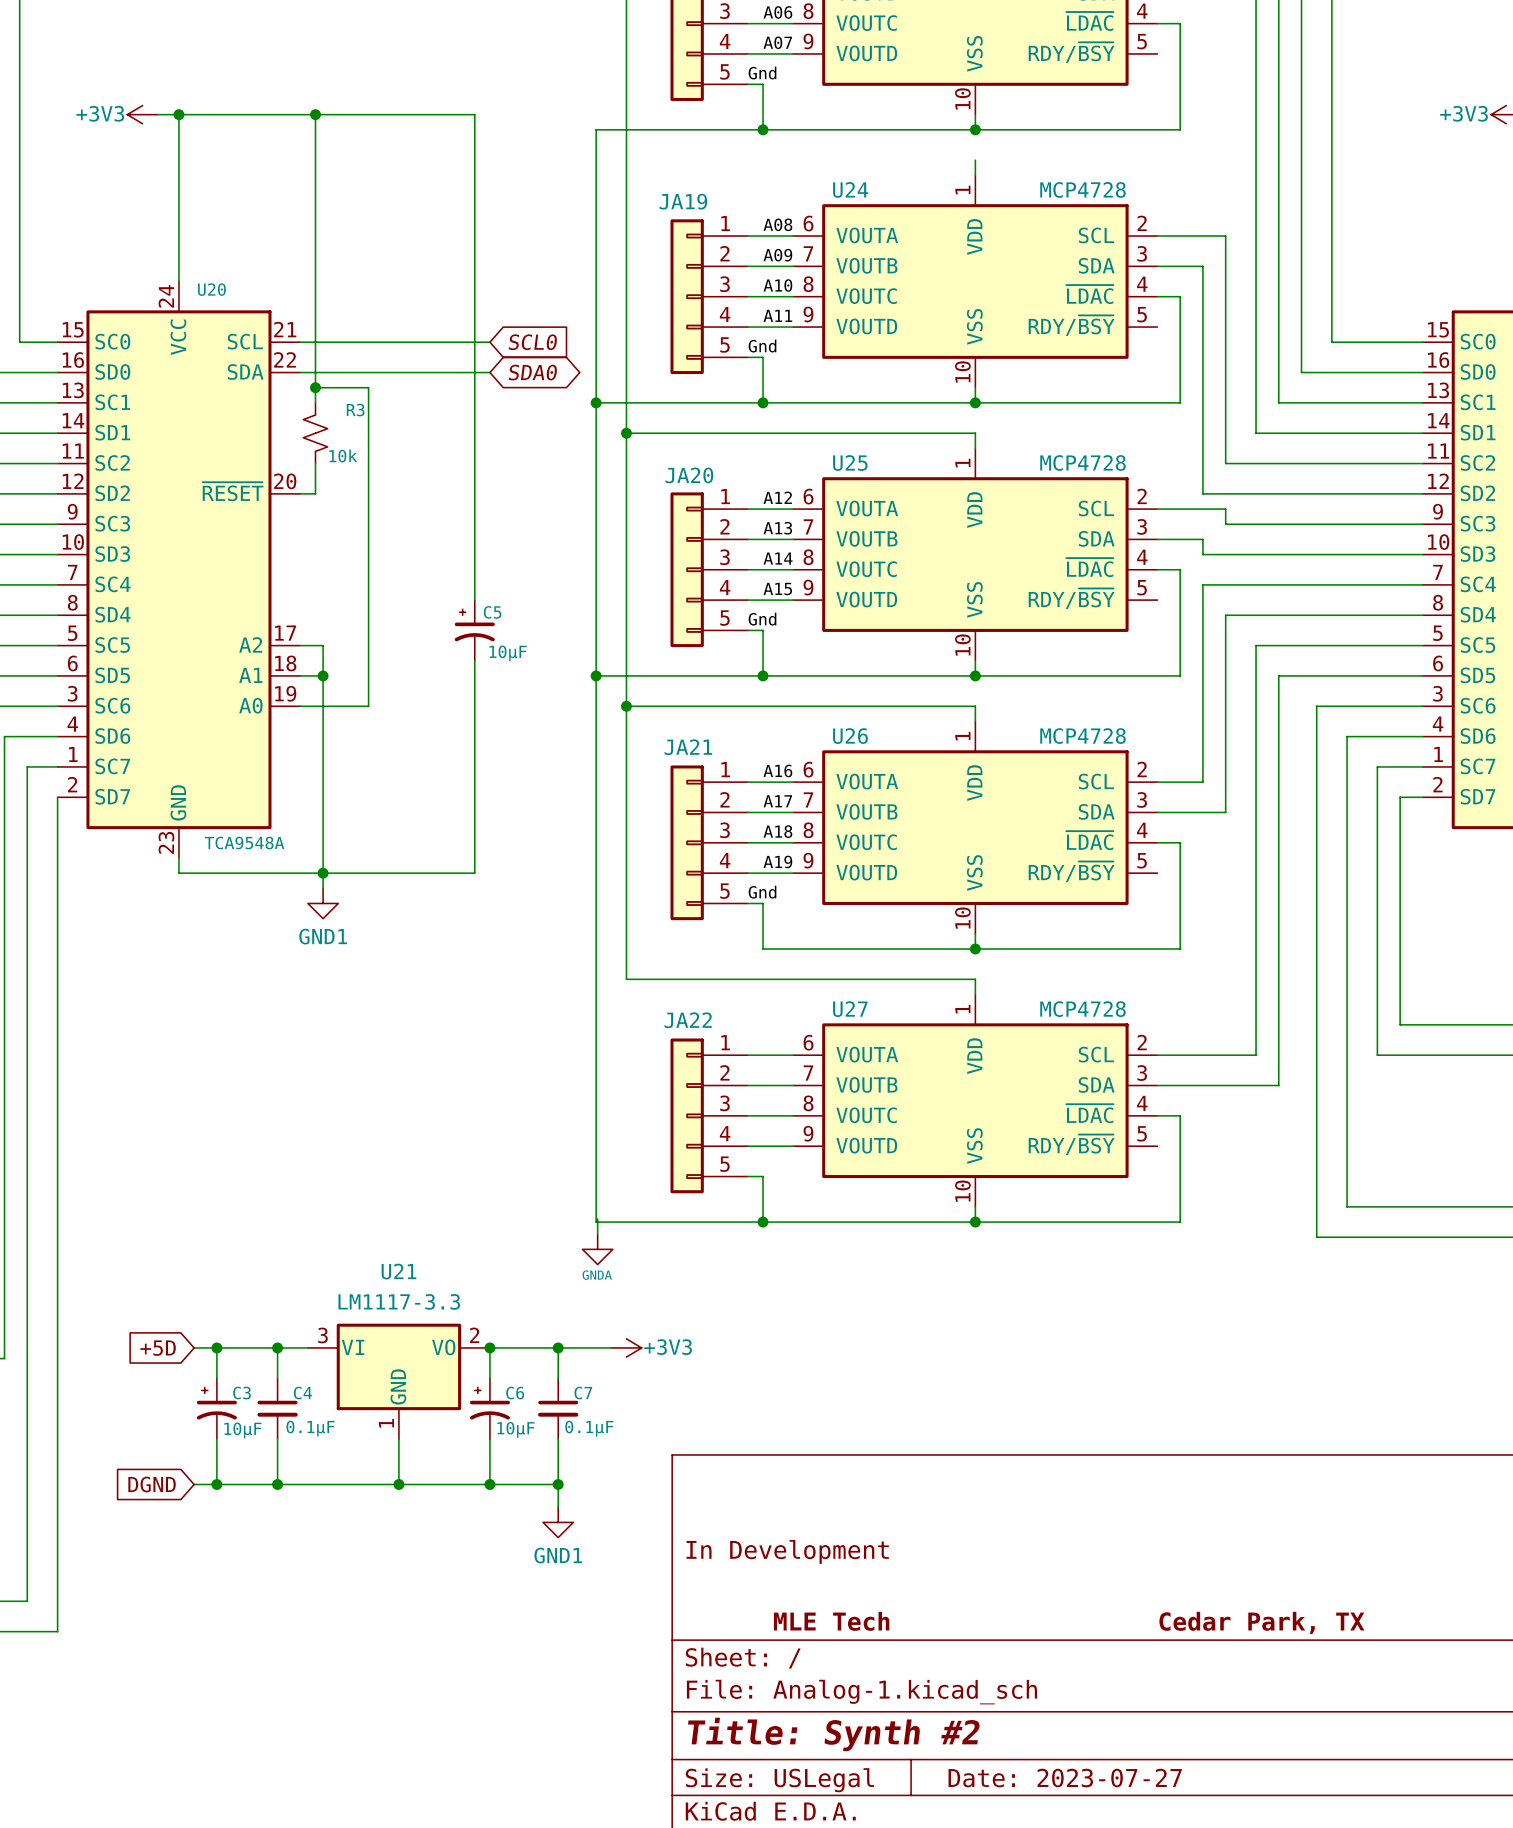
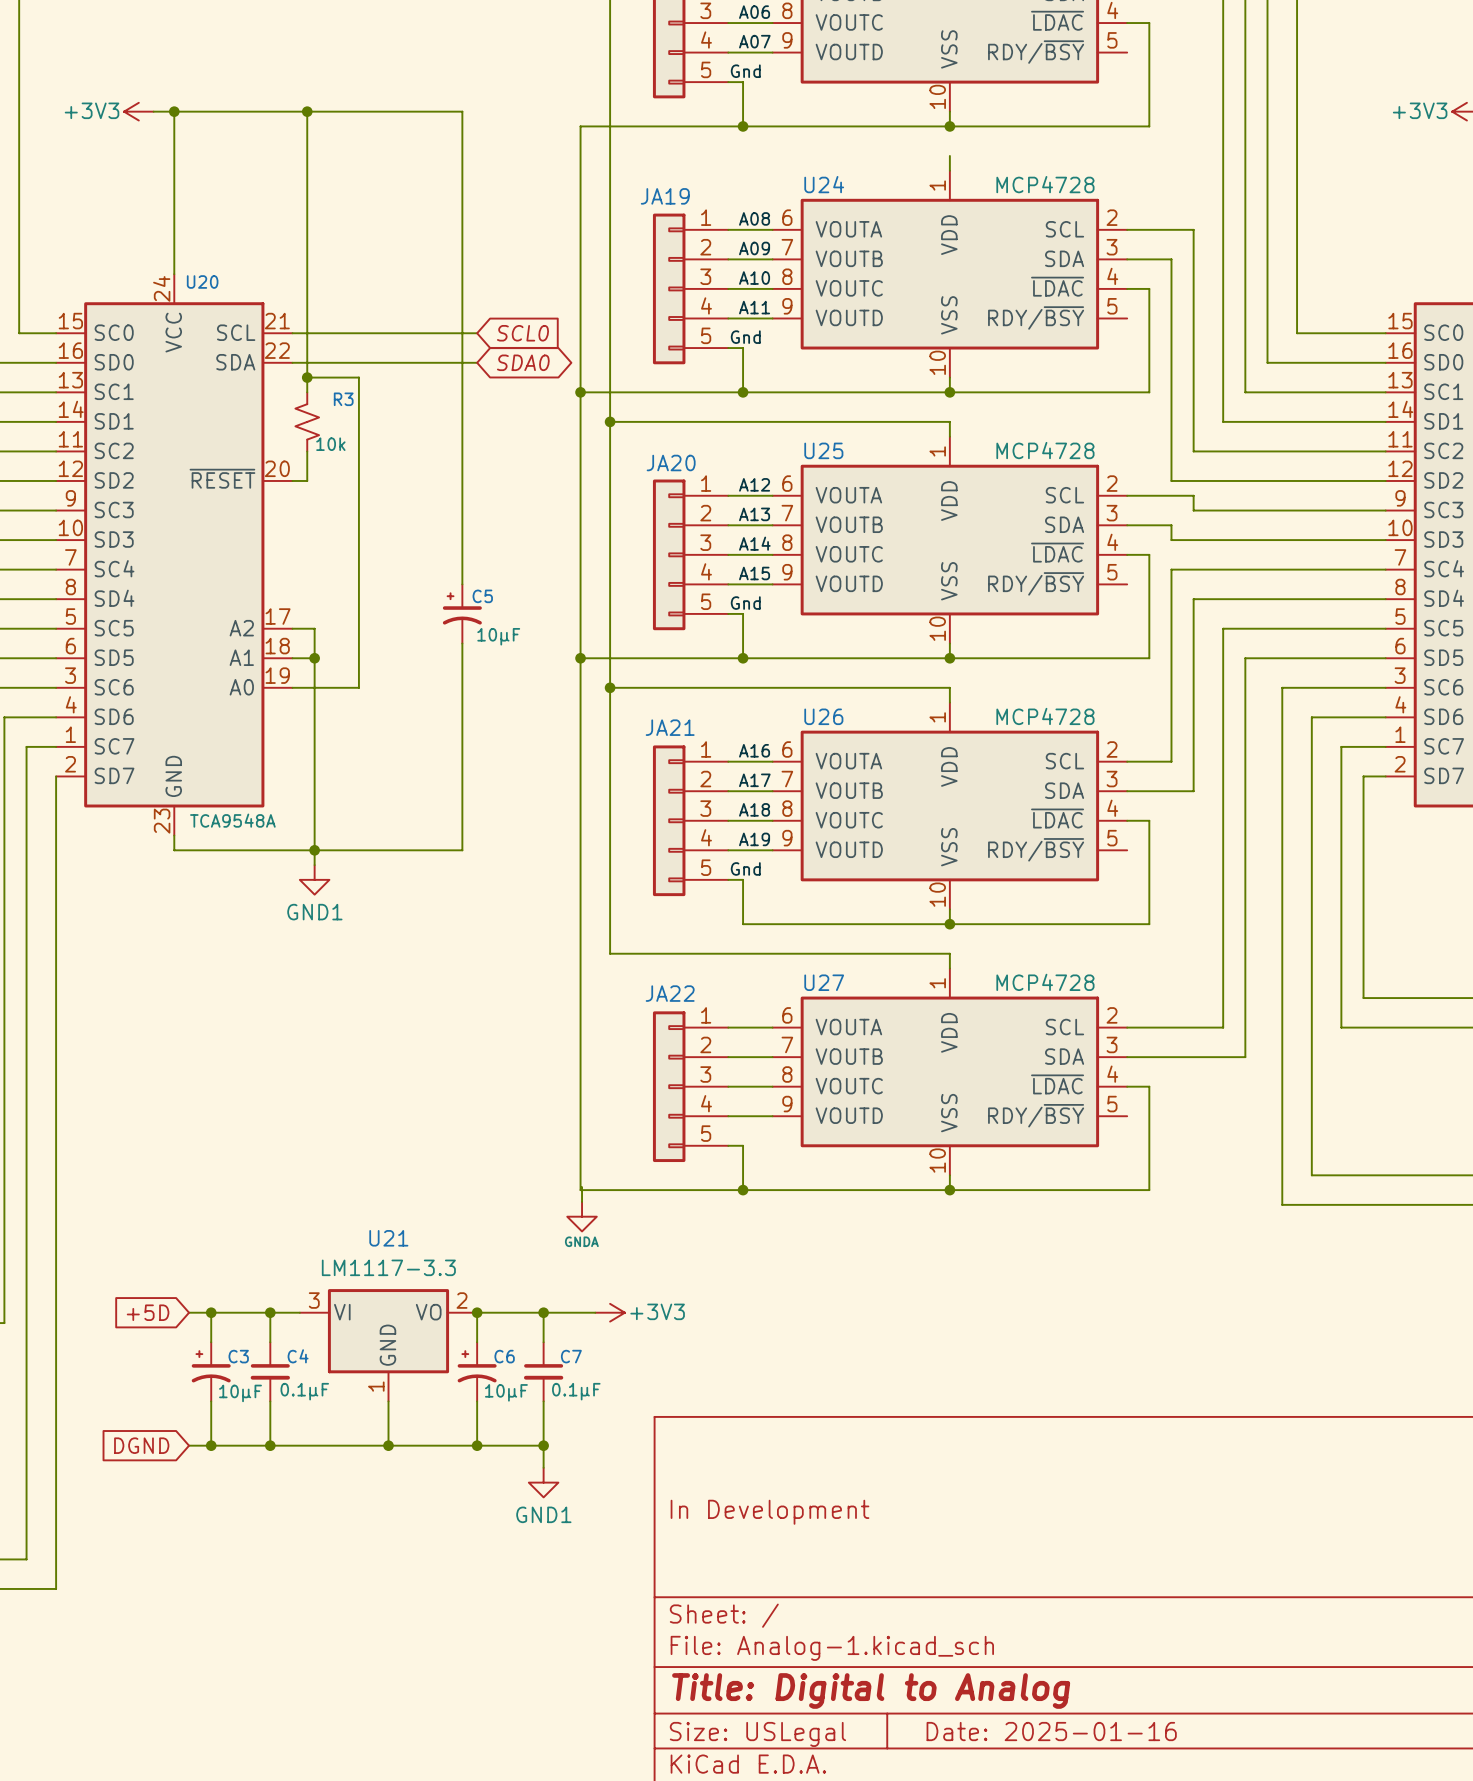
title block: MLE Tech Cedar Park, TX (1069, 1622) -> none
title block: Title: Synth #2 (833, 1734) -> Title: Digital to Analog (871, 1690)
title block: Date: 2023-07-27 (1065, 1778) -> Date: 2025-01-16 (1051, 1731)

